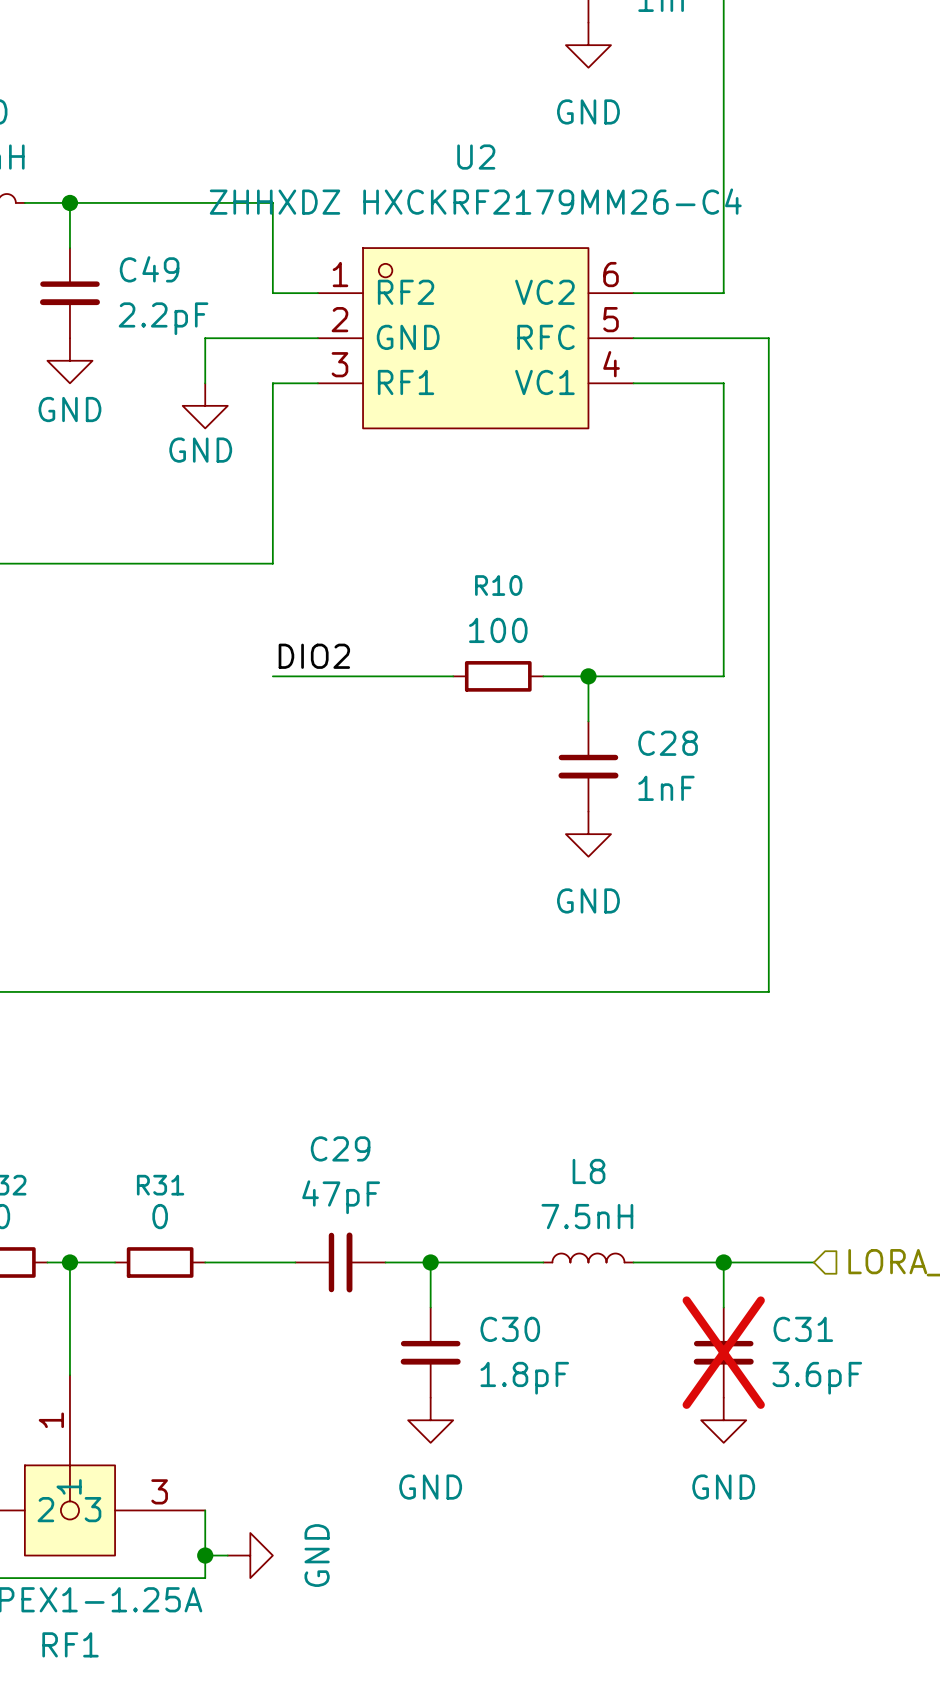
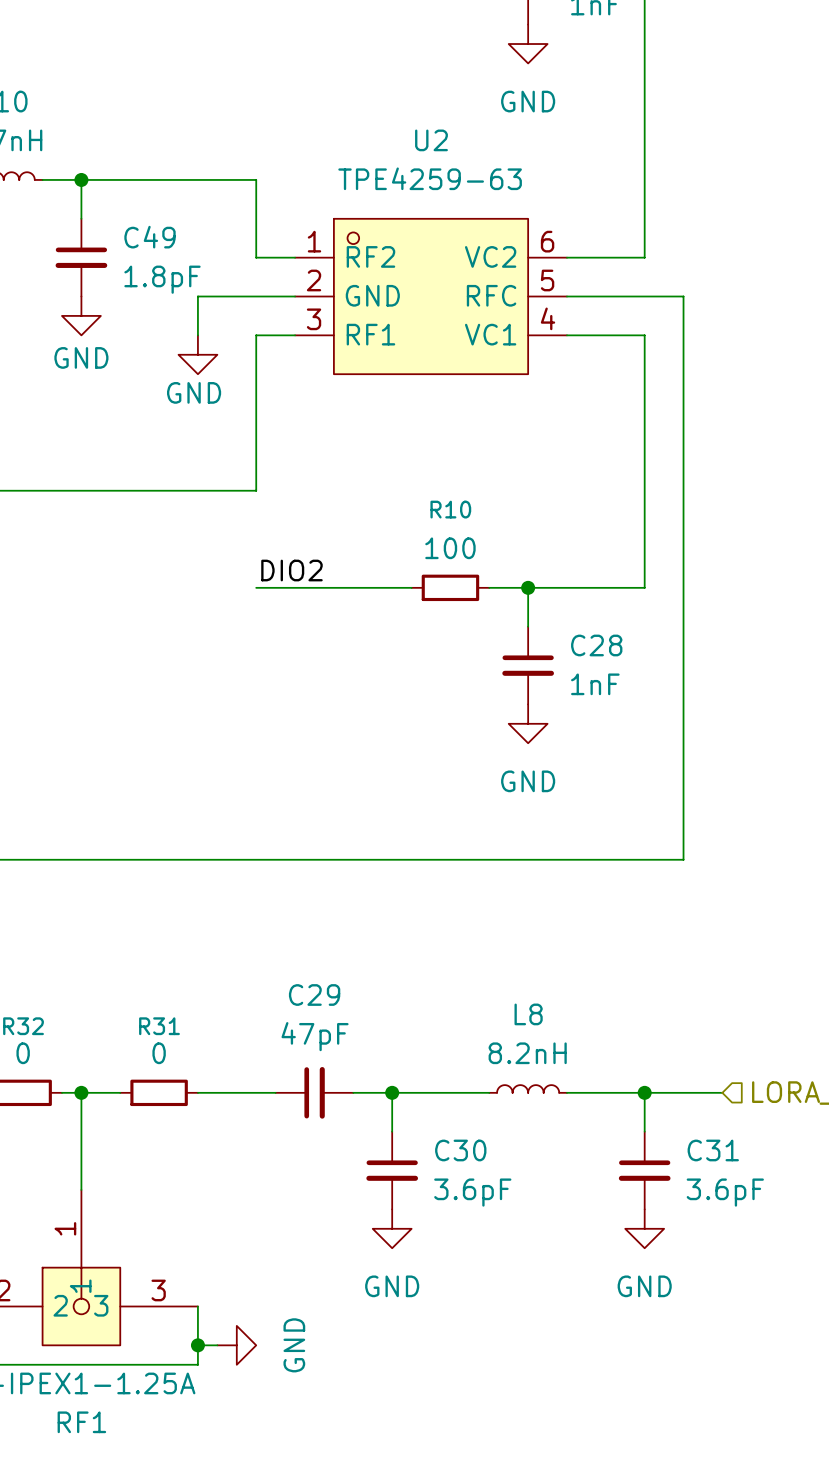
U2 value: ZHHXDZ HXCKRF2179MM26-C4 (475, 201) -> TPE4259-63 (430, 178)
C49 value: 2.2pF (163, 318) -> 1.8pF (162, 279)
L8 value: 7.5nH (587, 1216) -> 8.2nH (527, 1053)
C31 do-not-place cross: (723, 1352) -> none
C30 value: 1.8pF (524, 1378) -> 3.6pF (472, 1192)

